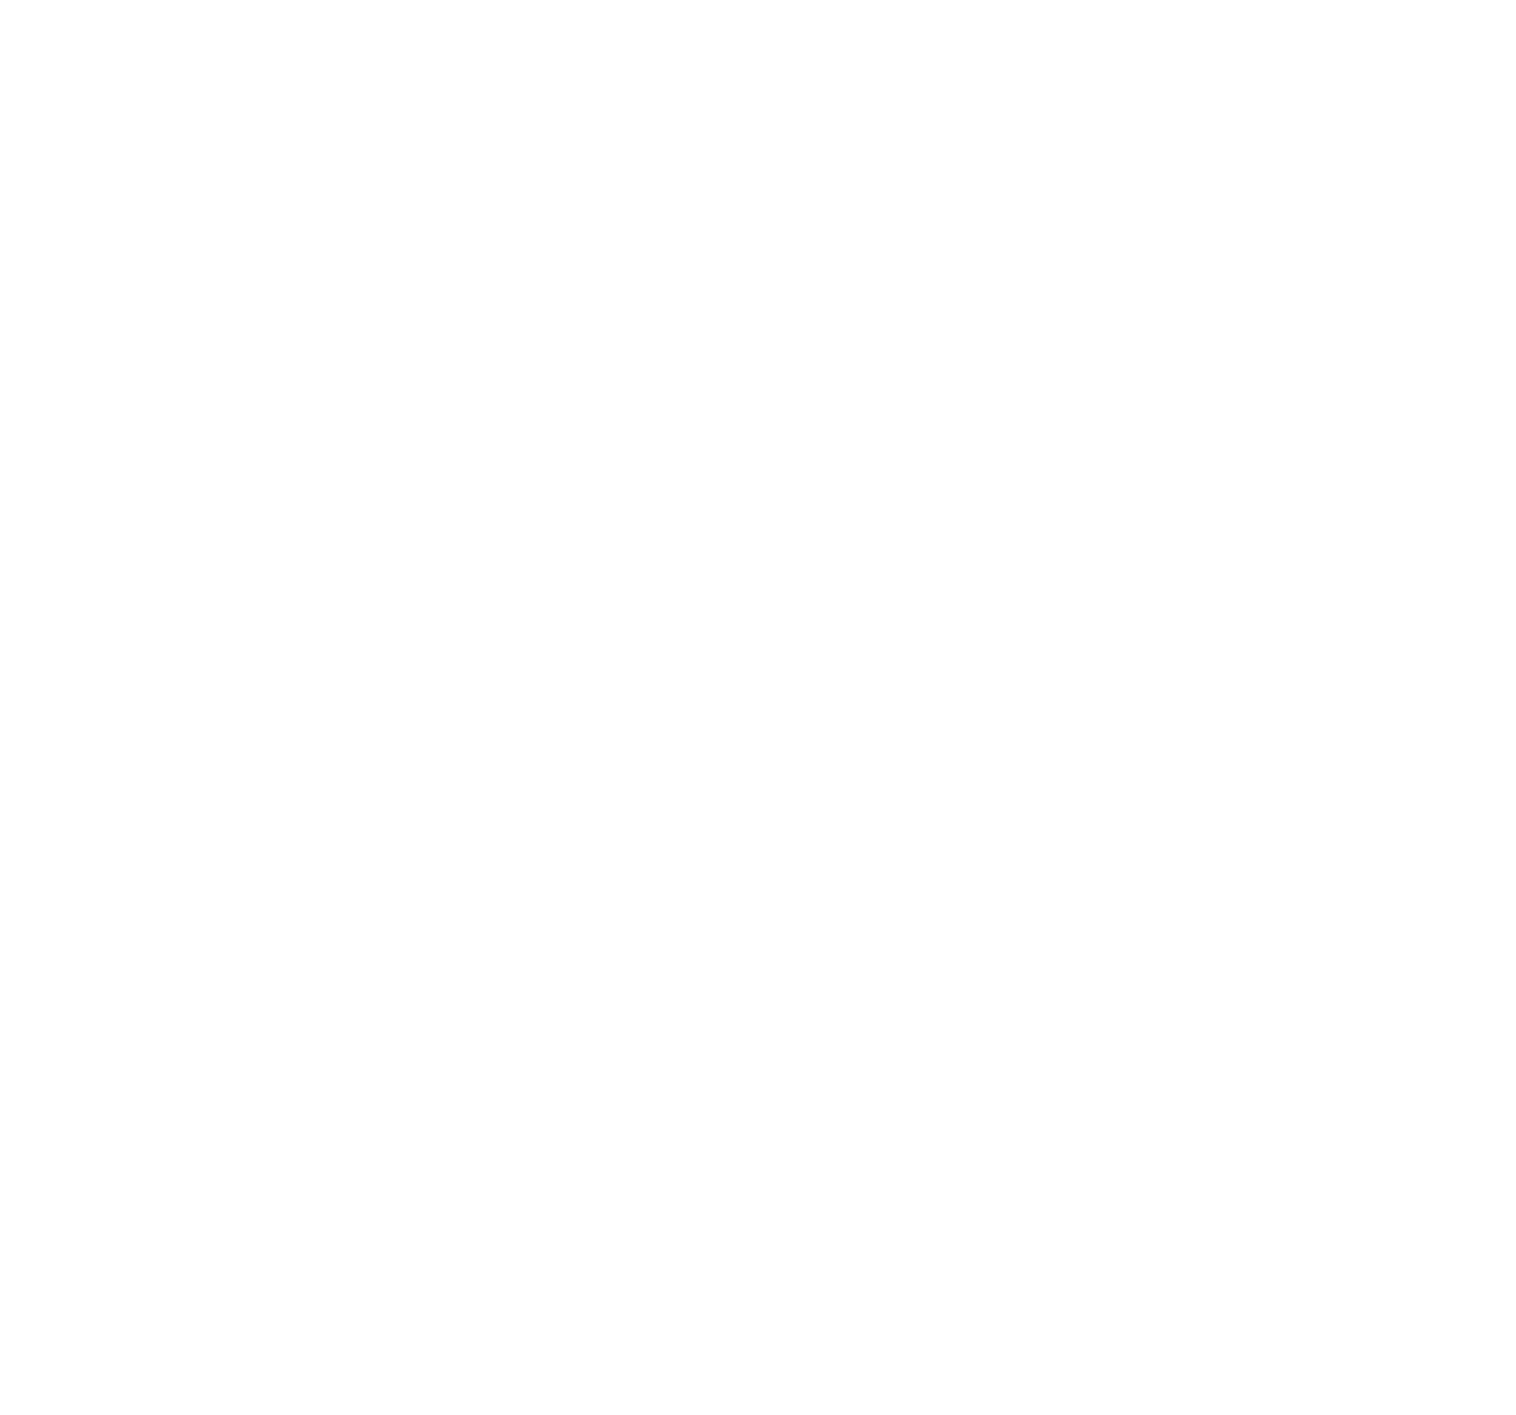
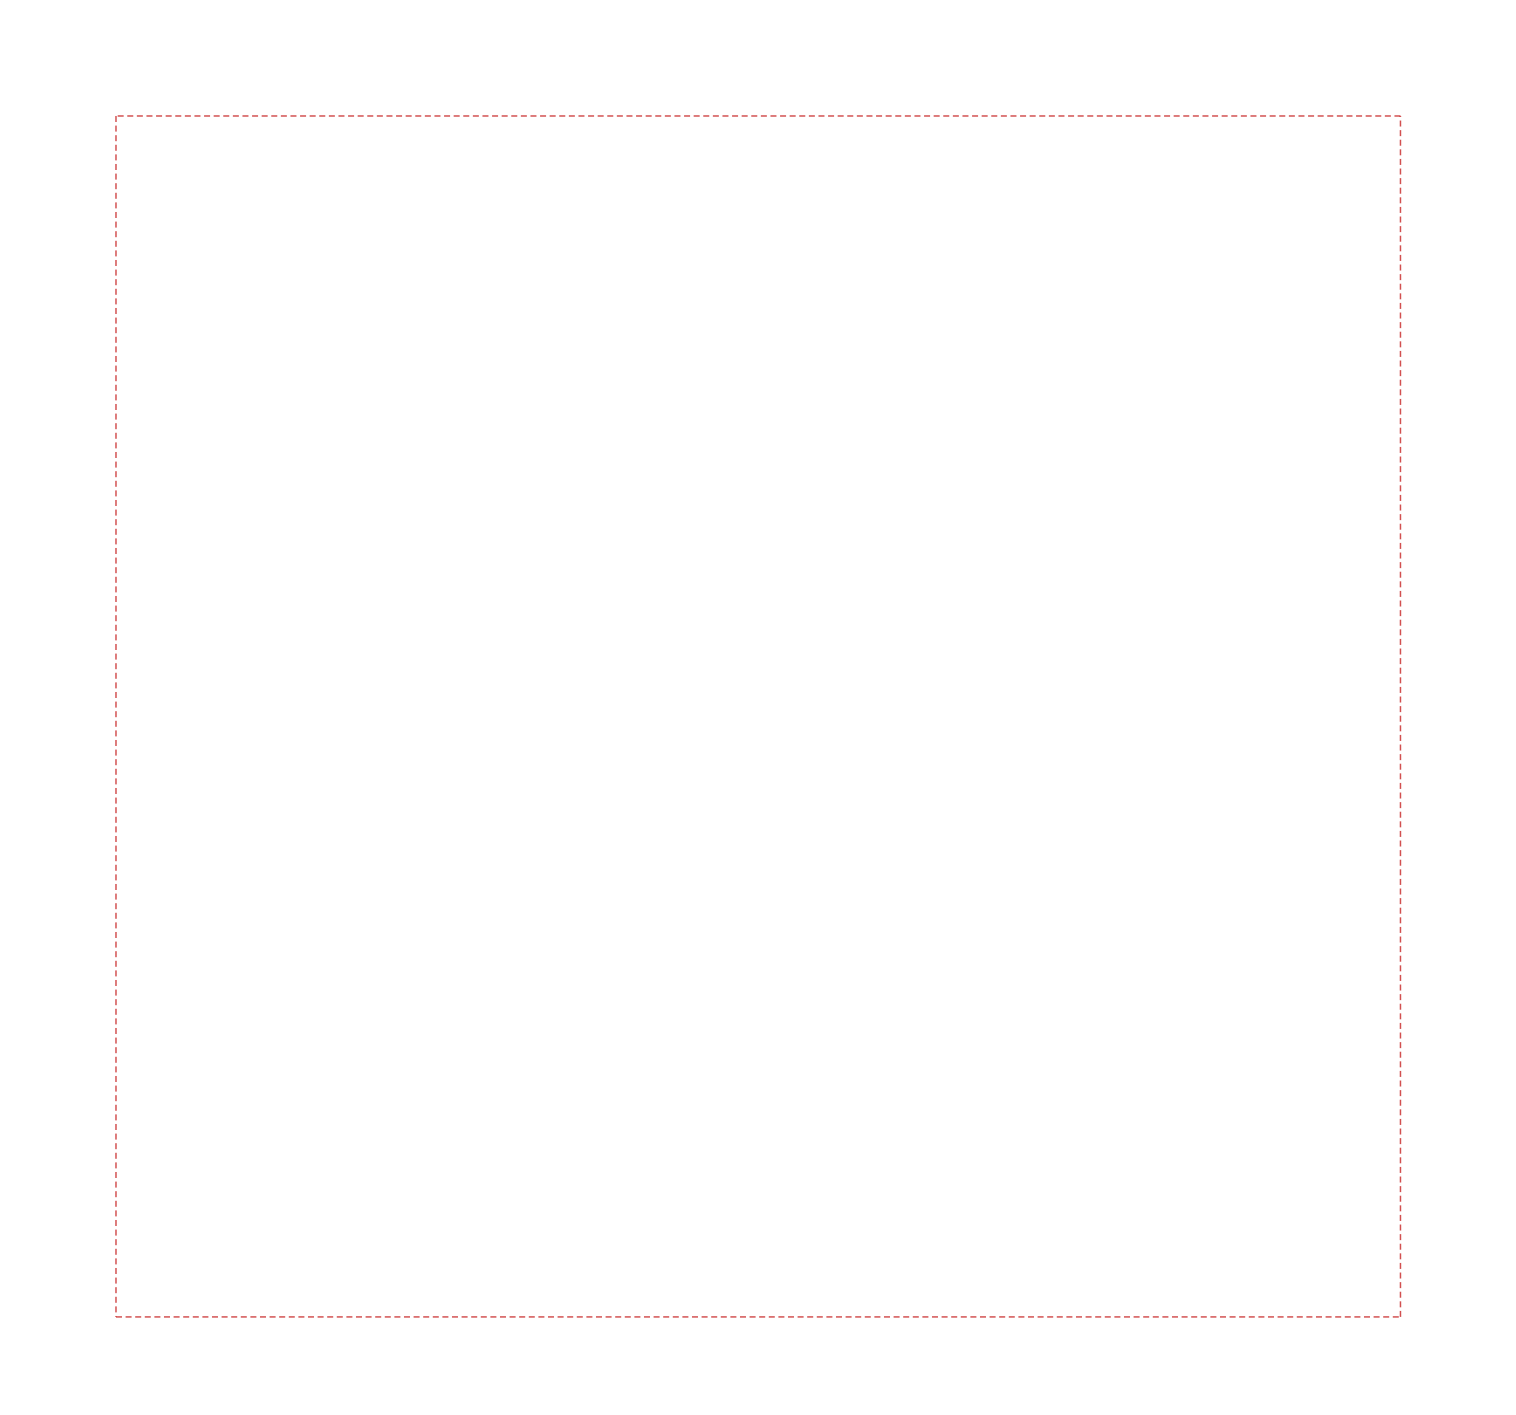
zone outline: none -> (115, 115) (115, 1316) (1400, 1316) (1400, 115) (115, 115)

